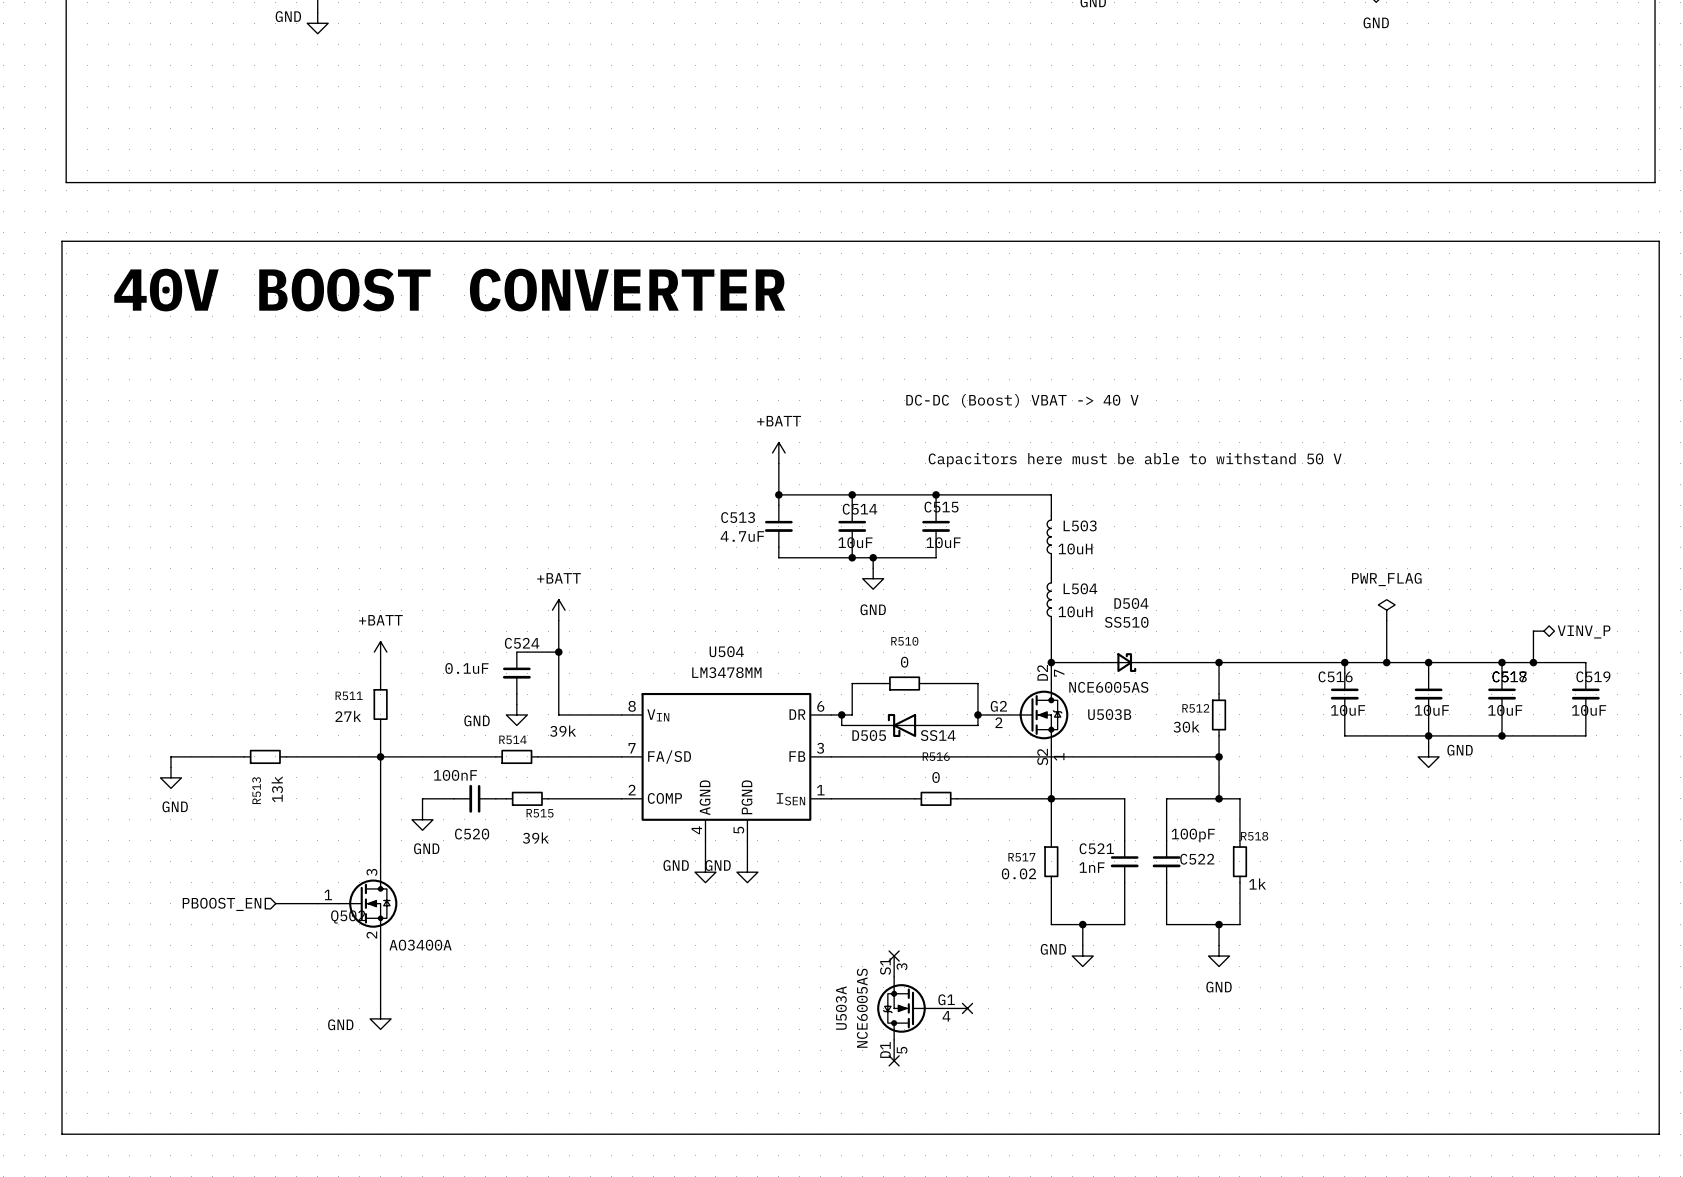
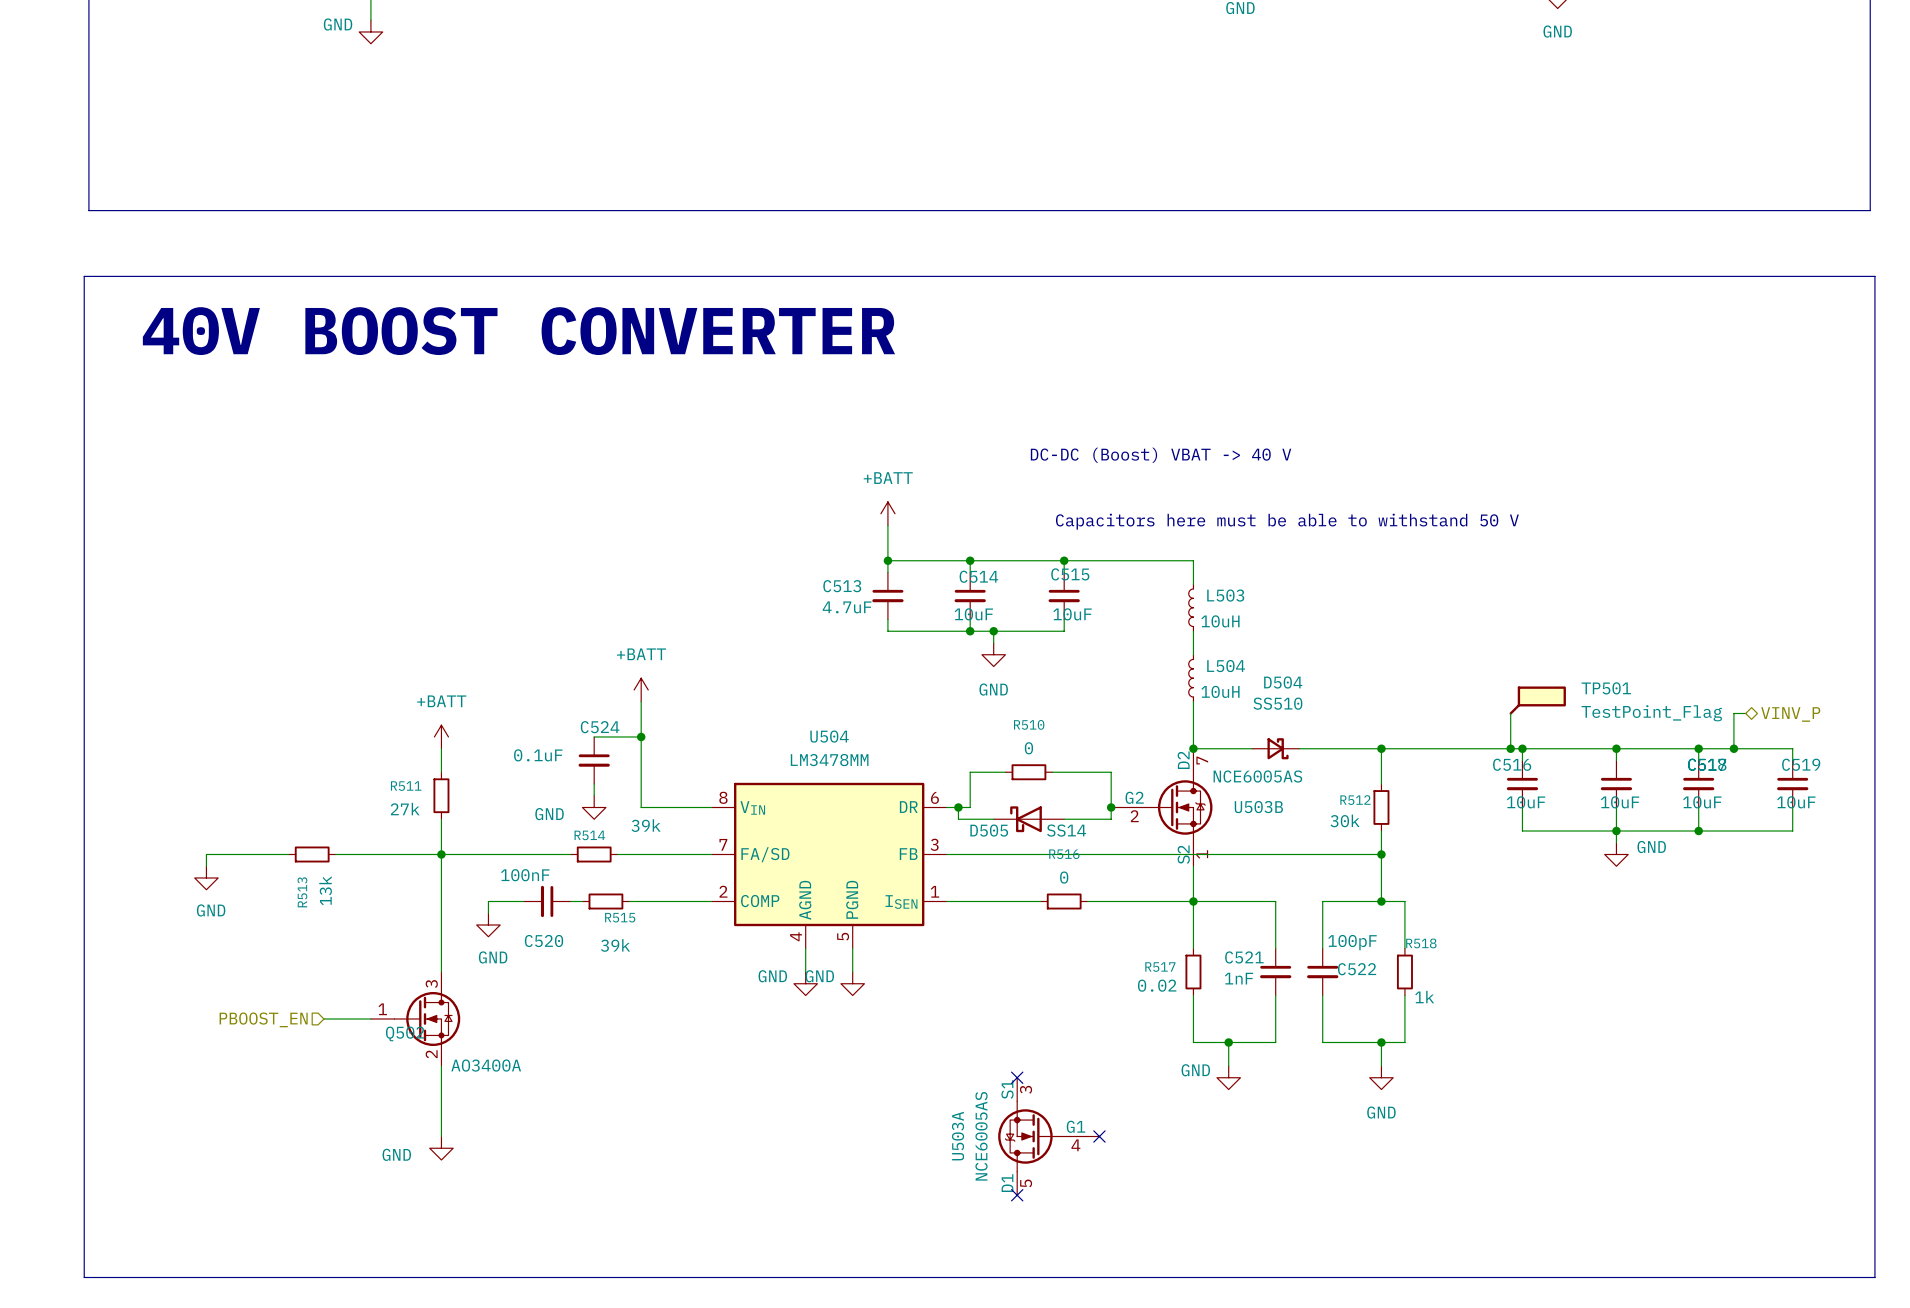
power symbol: PWR_FLAG (1386, 610) -> none
TP501: none -> TestPoint_Flag (1537, 700)
wire: (1386, 620) (1386, 662) -> none
wire: none -> (1510, 713) (1510, 748)
junction: none -> (1510, 748)
junction: (1386, 662) -> none

